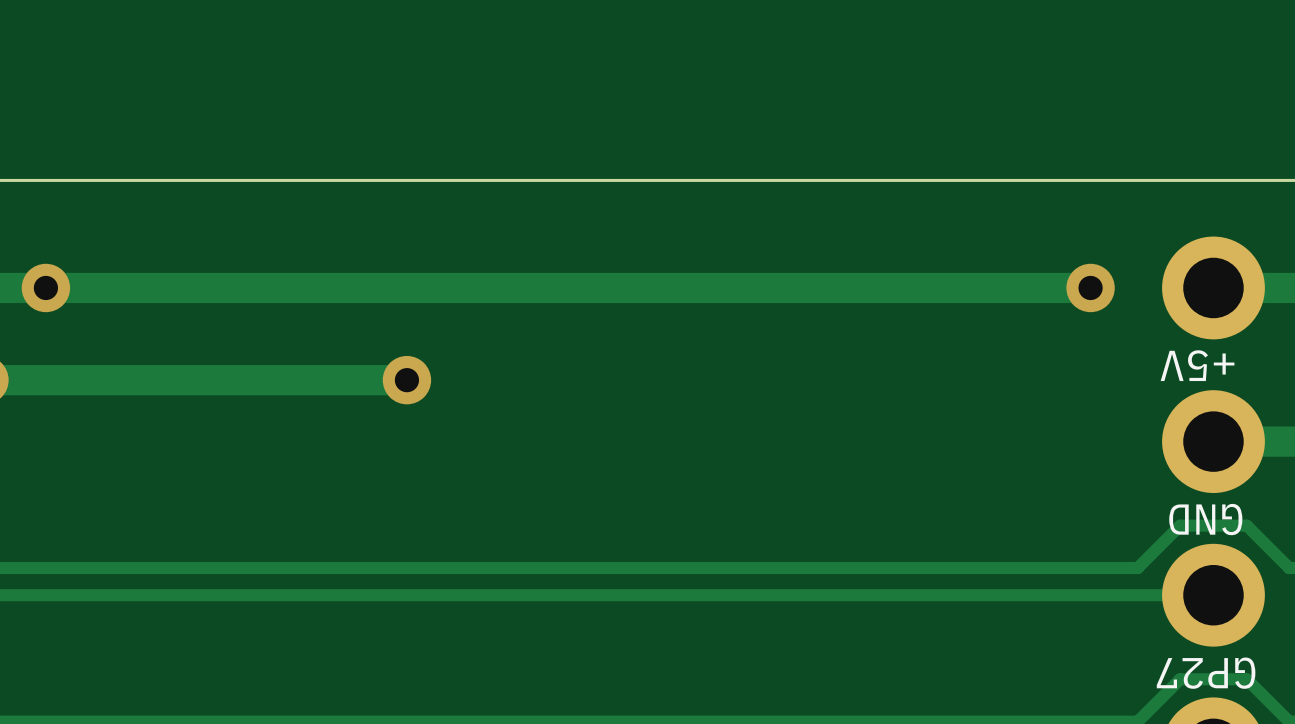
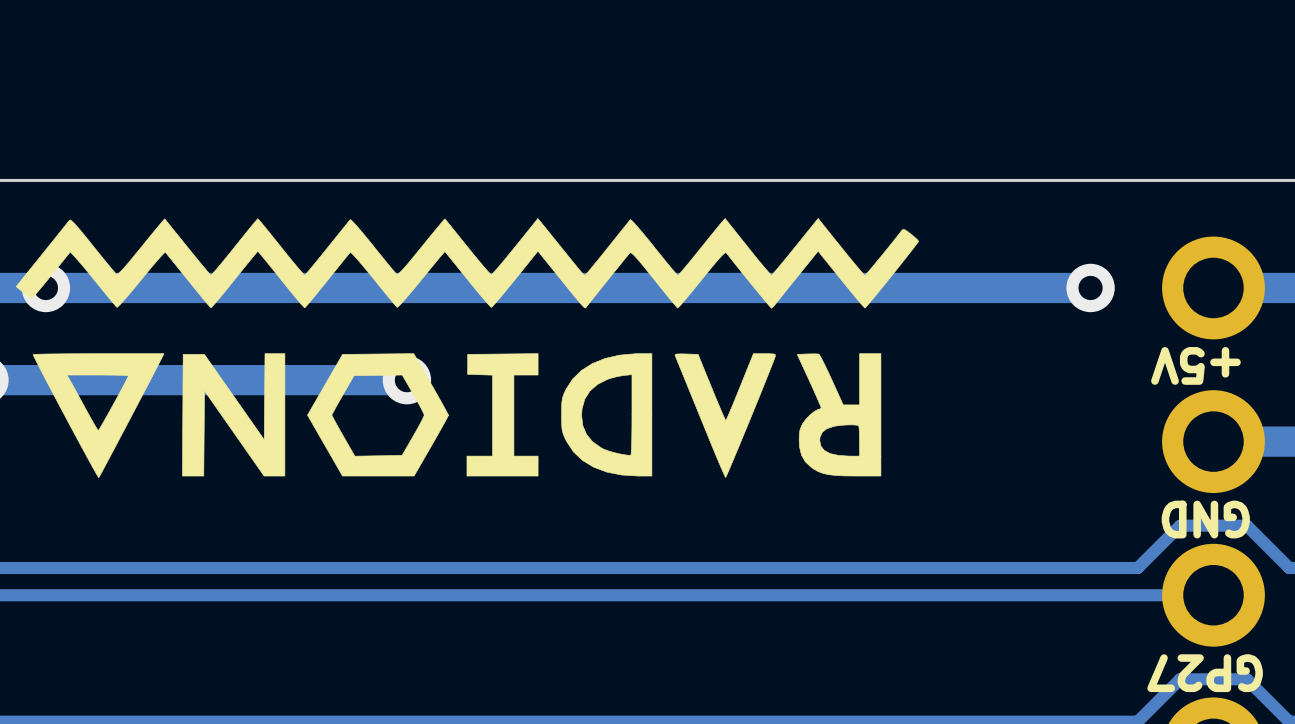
drawing: none -> [15, 218, 919, 478]

